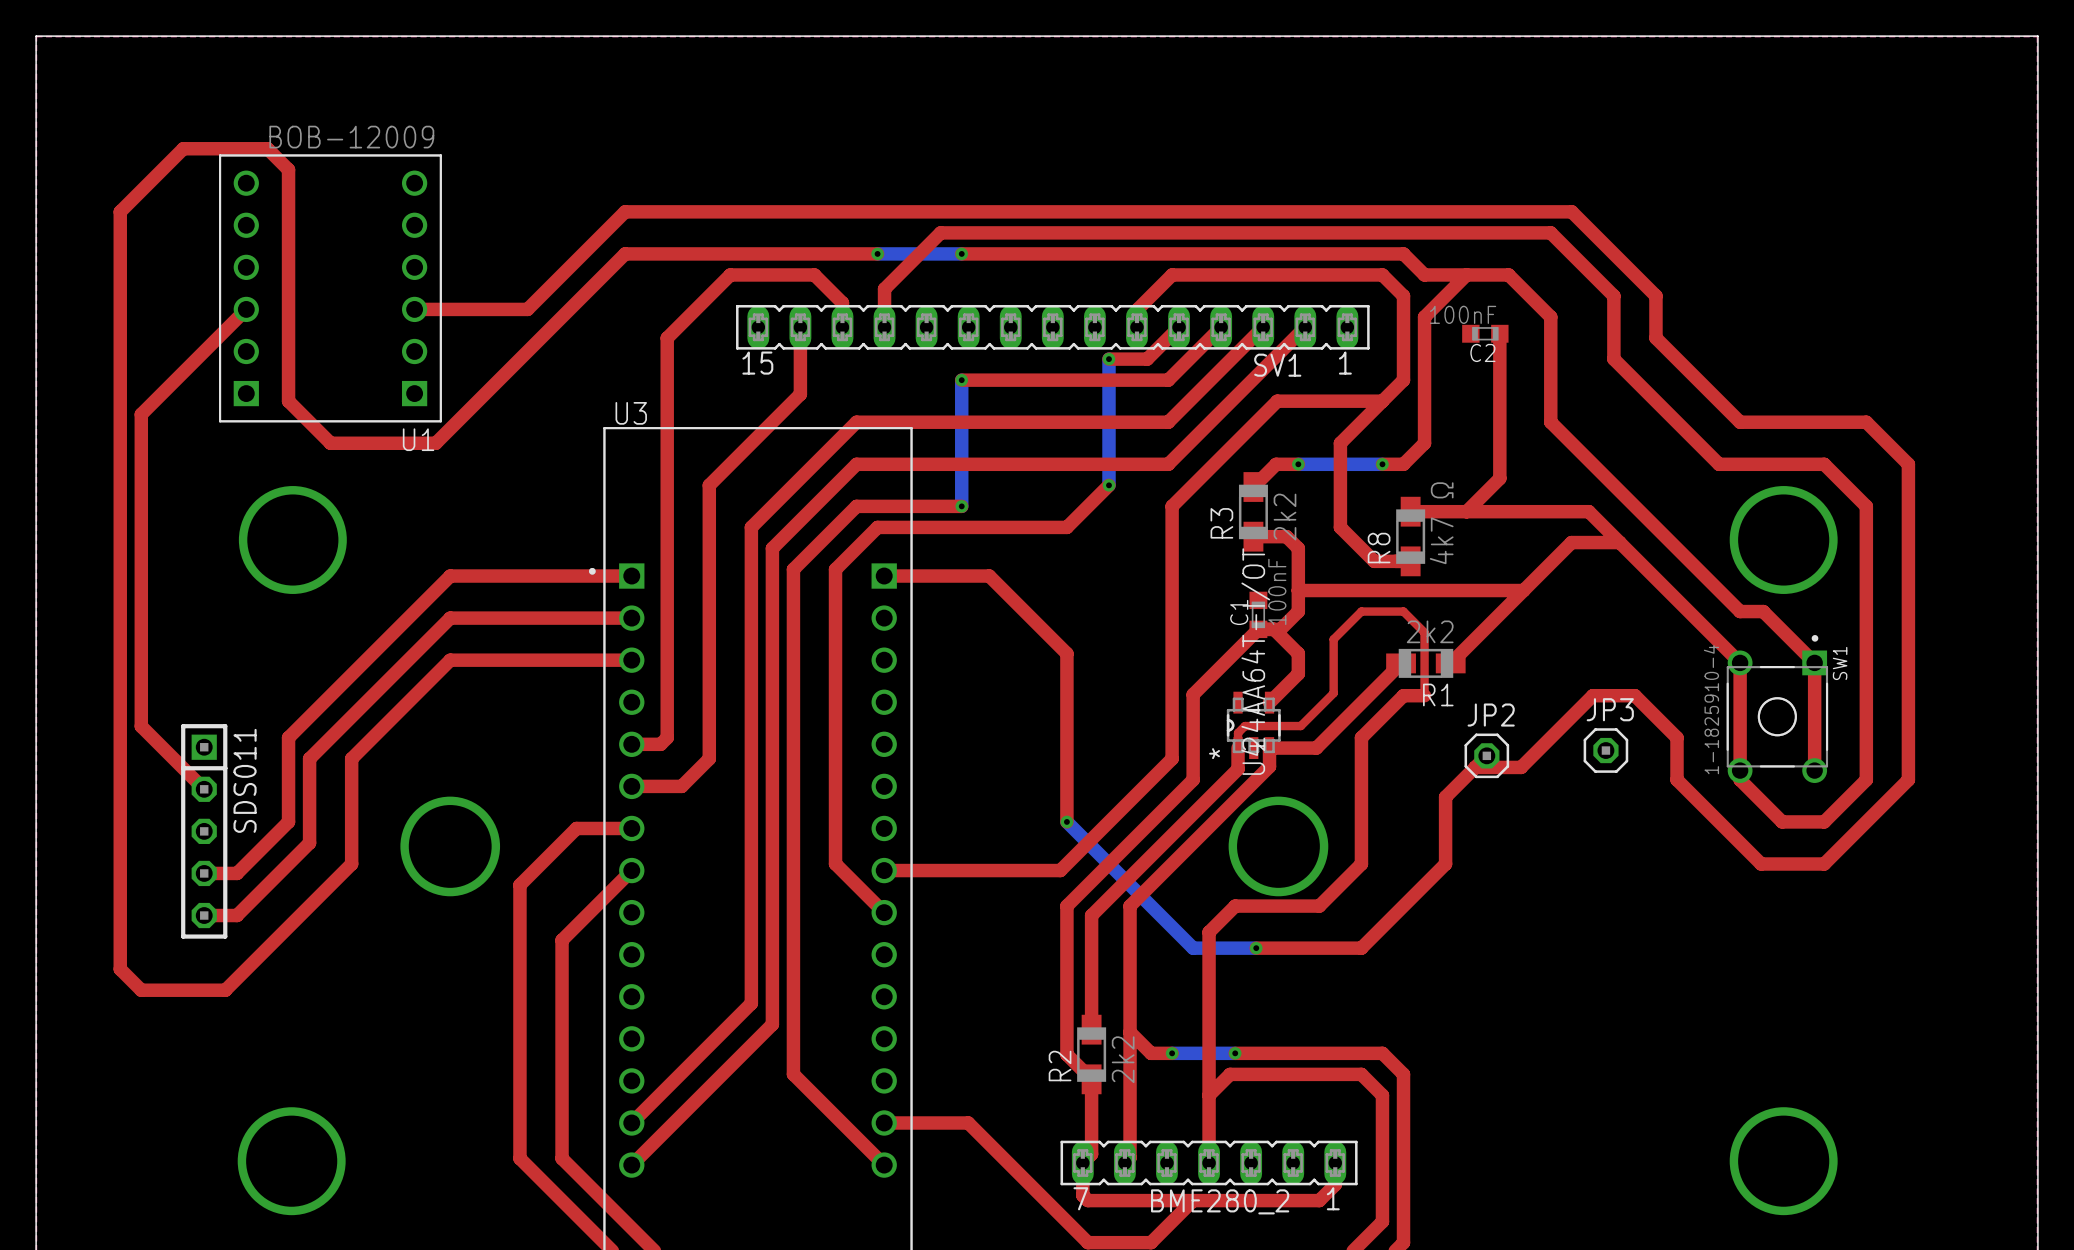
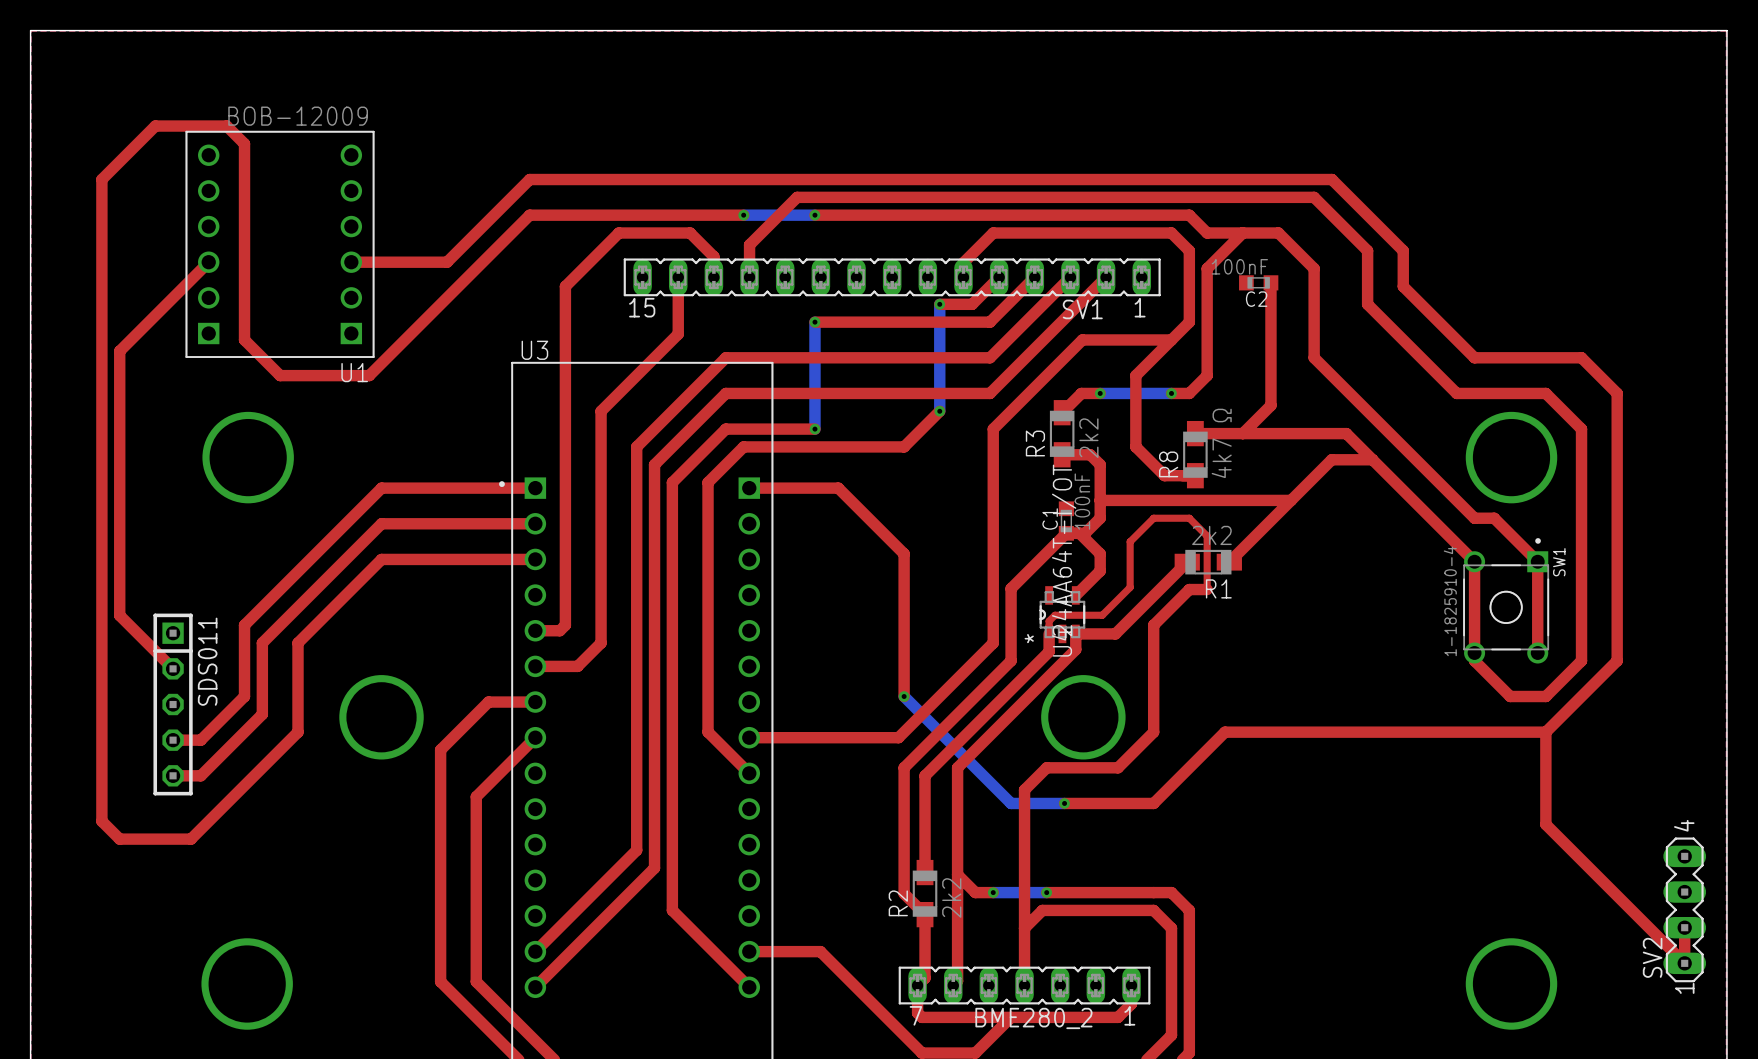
JP3: (1605, 750) -> none
top track: (1486, 755) (1445, 797) (1445, 864) -> none
JP2: (1486, 755) -> none
top track: (1475, 767) (1521, 767) (1592, 695) (1634, 695) (1677, 737) (1677, 779) (1761, 864) -> (1225, 732) (1492, 732)
top track: none -> (1545, 732) (1545, 824) (1684, 963) (1684, 927)
SV2: none -> (1684, 909)

